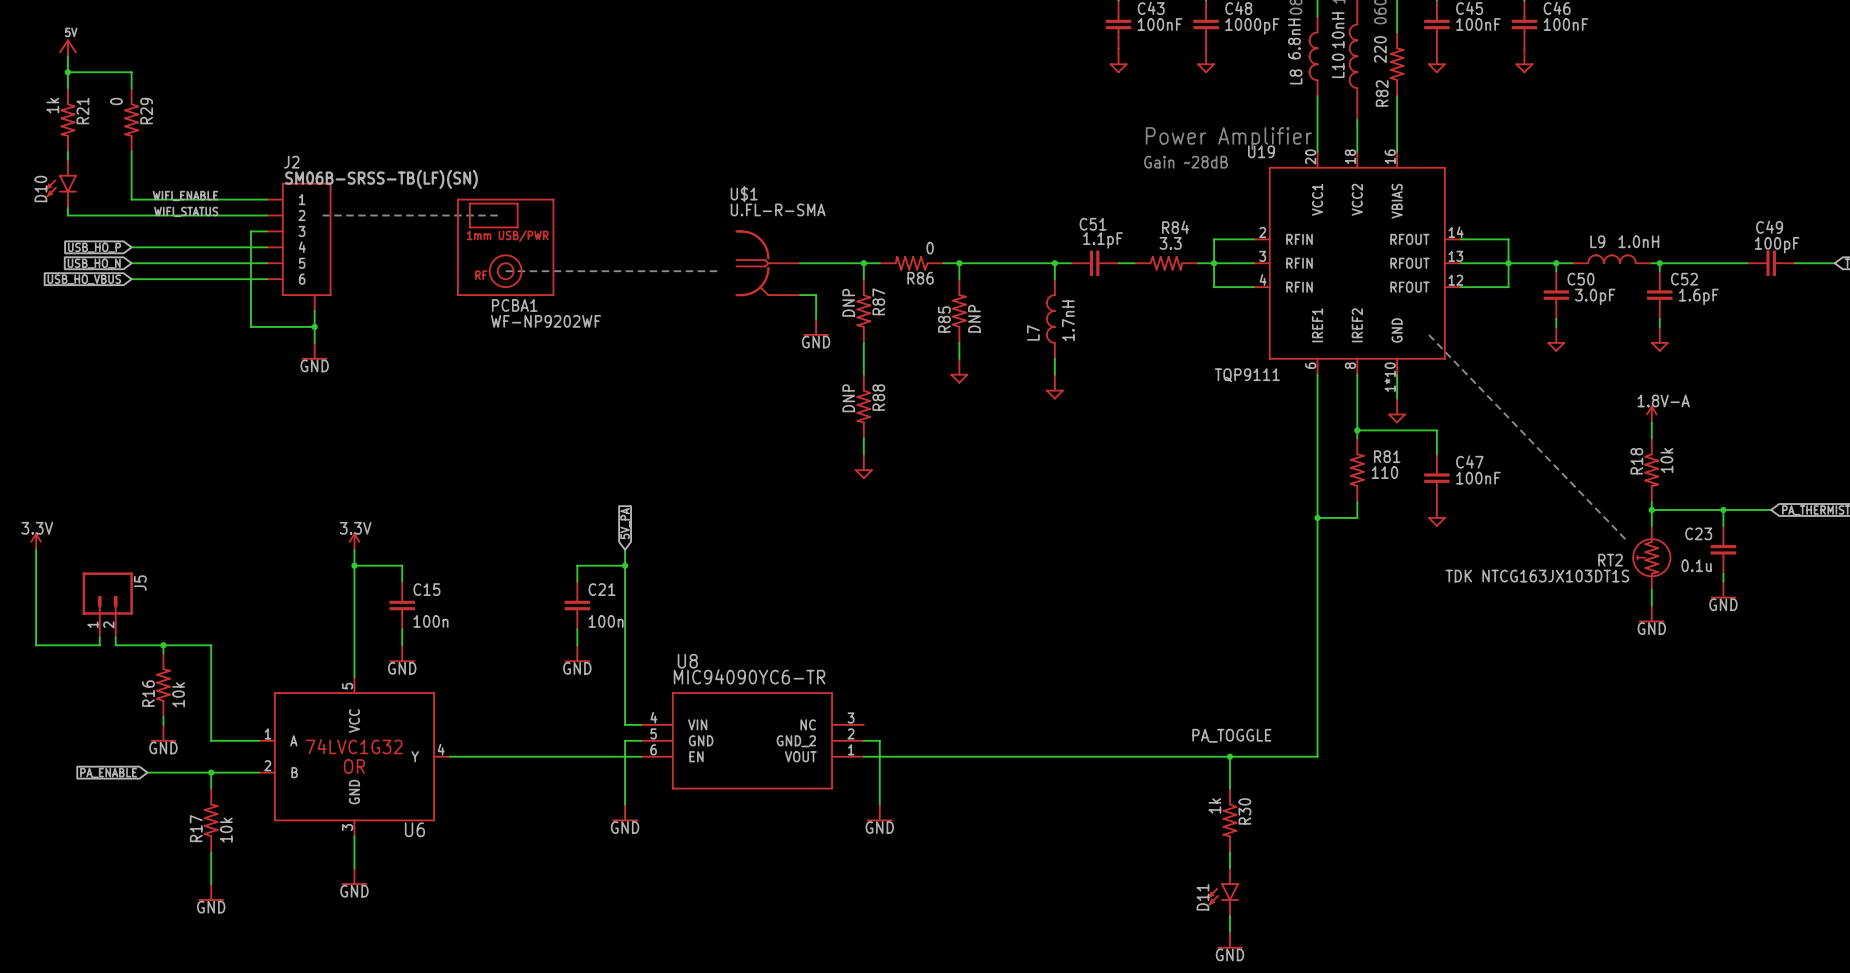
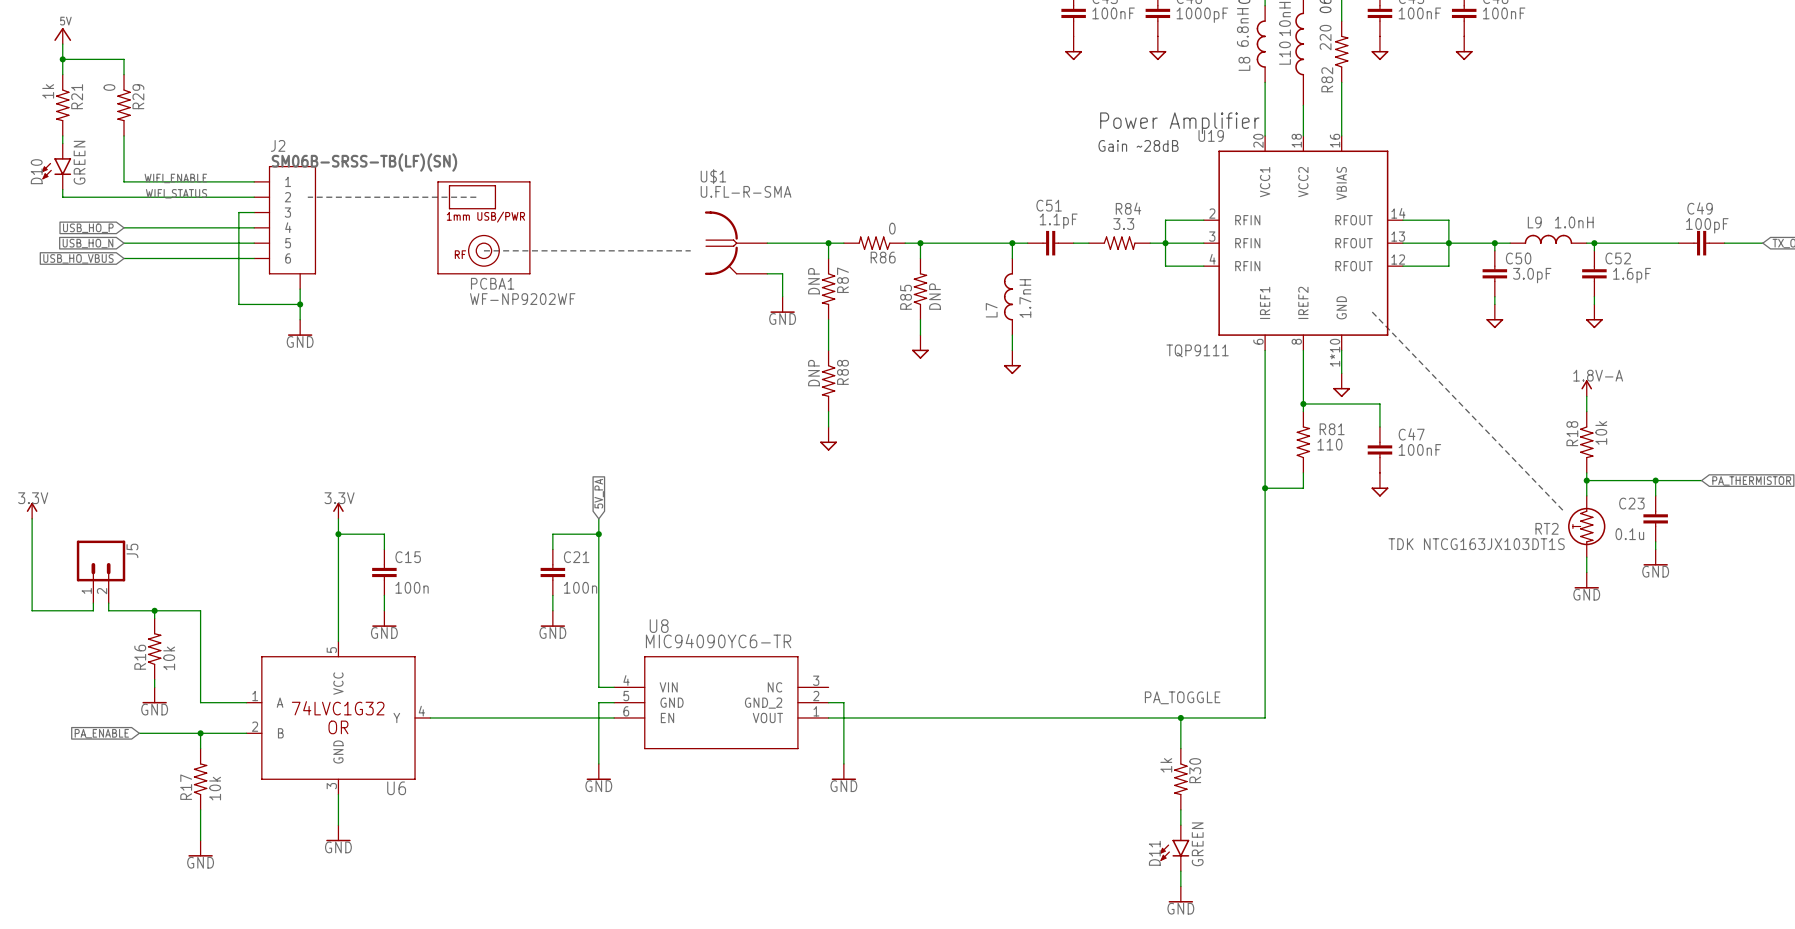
D10 value: none -> GREEN (79, 162)
D11 value: none -> GREEN (1197, 844)

